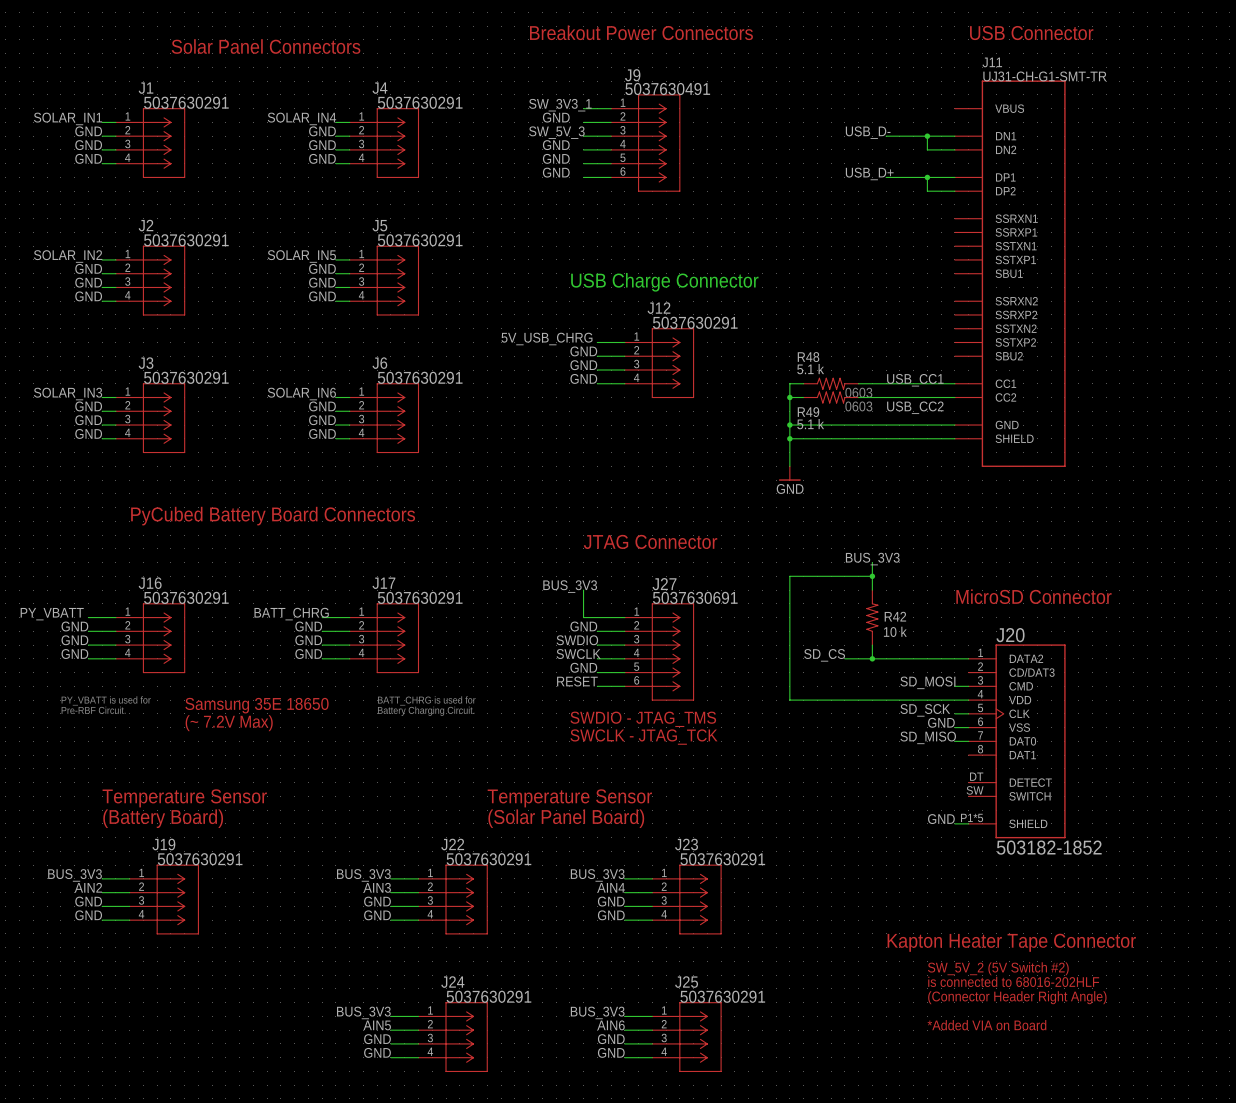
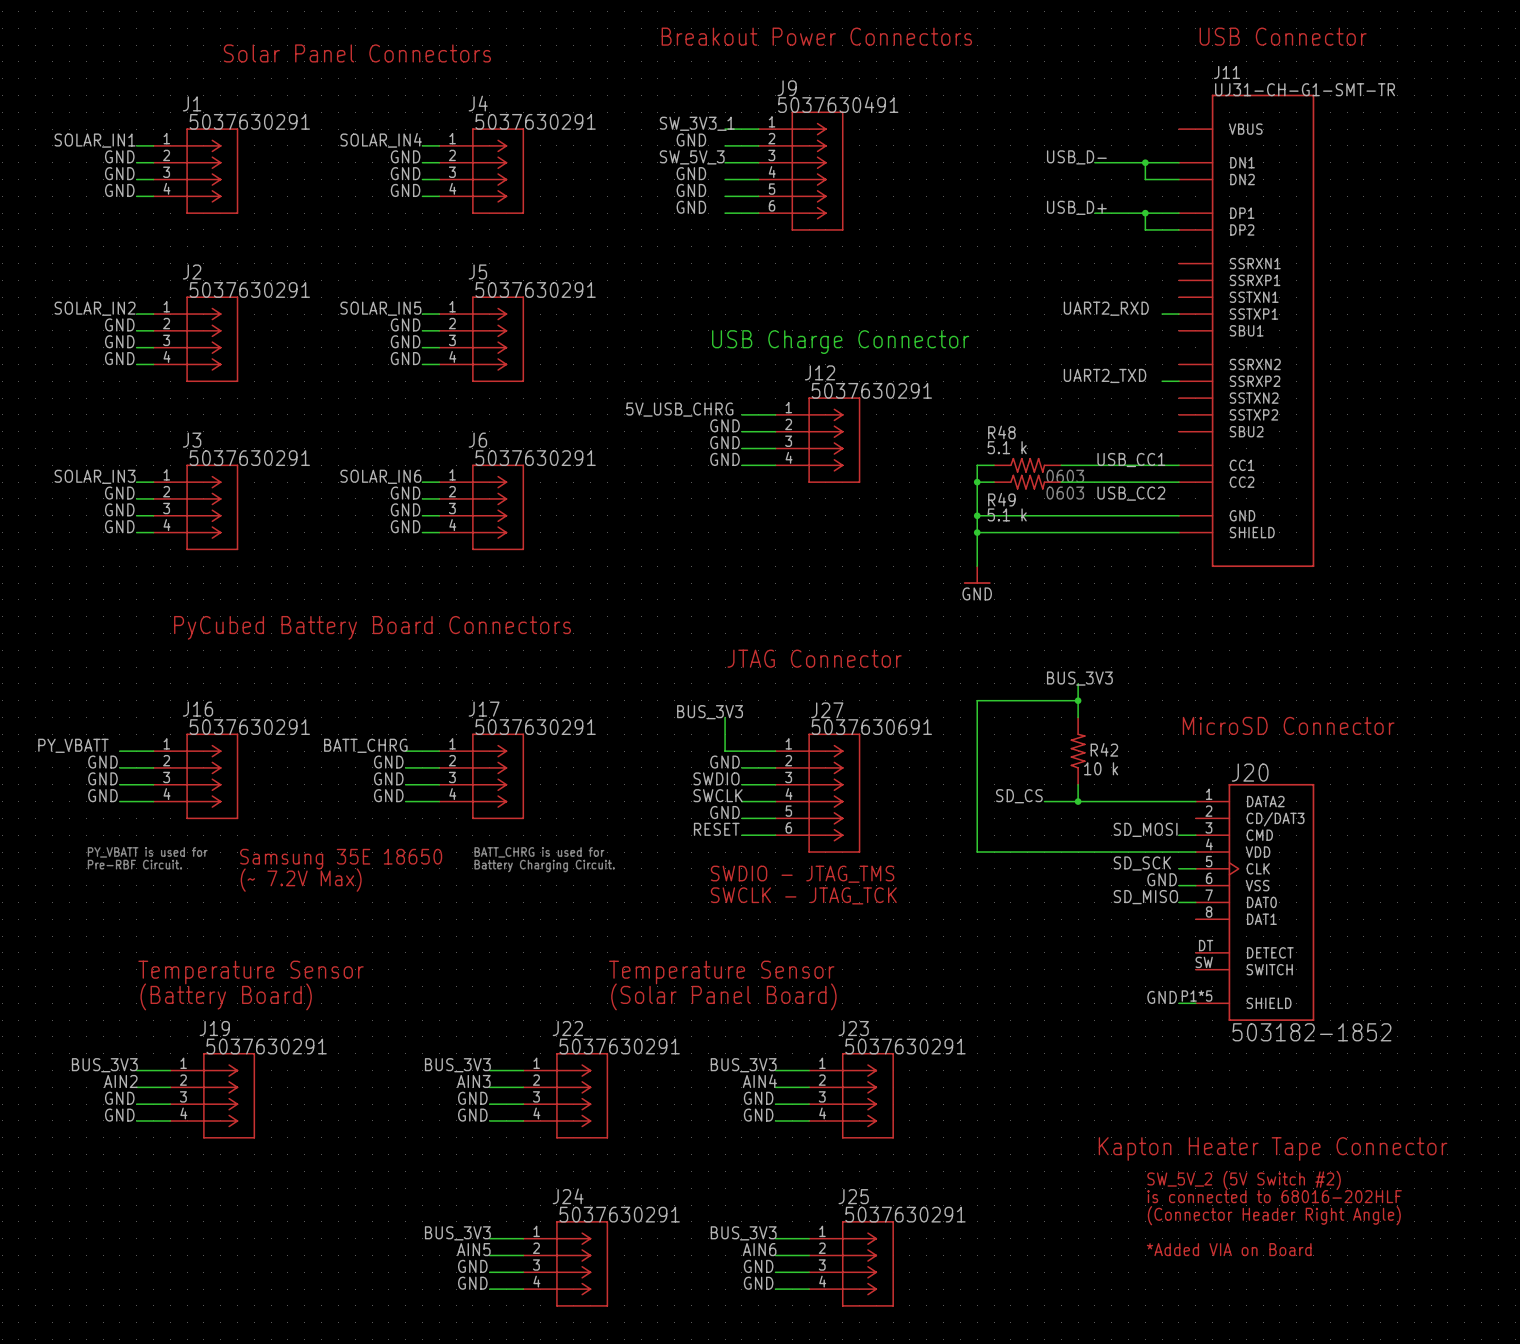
label: none -> UART2_RXD (1106, 308)
wire: none -> (1162, 314) (1178, 314)
label: none -> UART2_TXD (1105, 375)
wire: none -> (1162, 381) (1178, 381)

